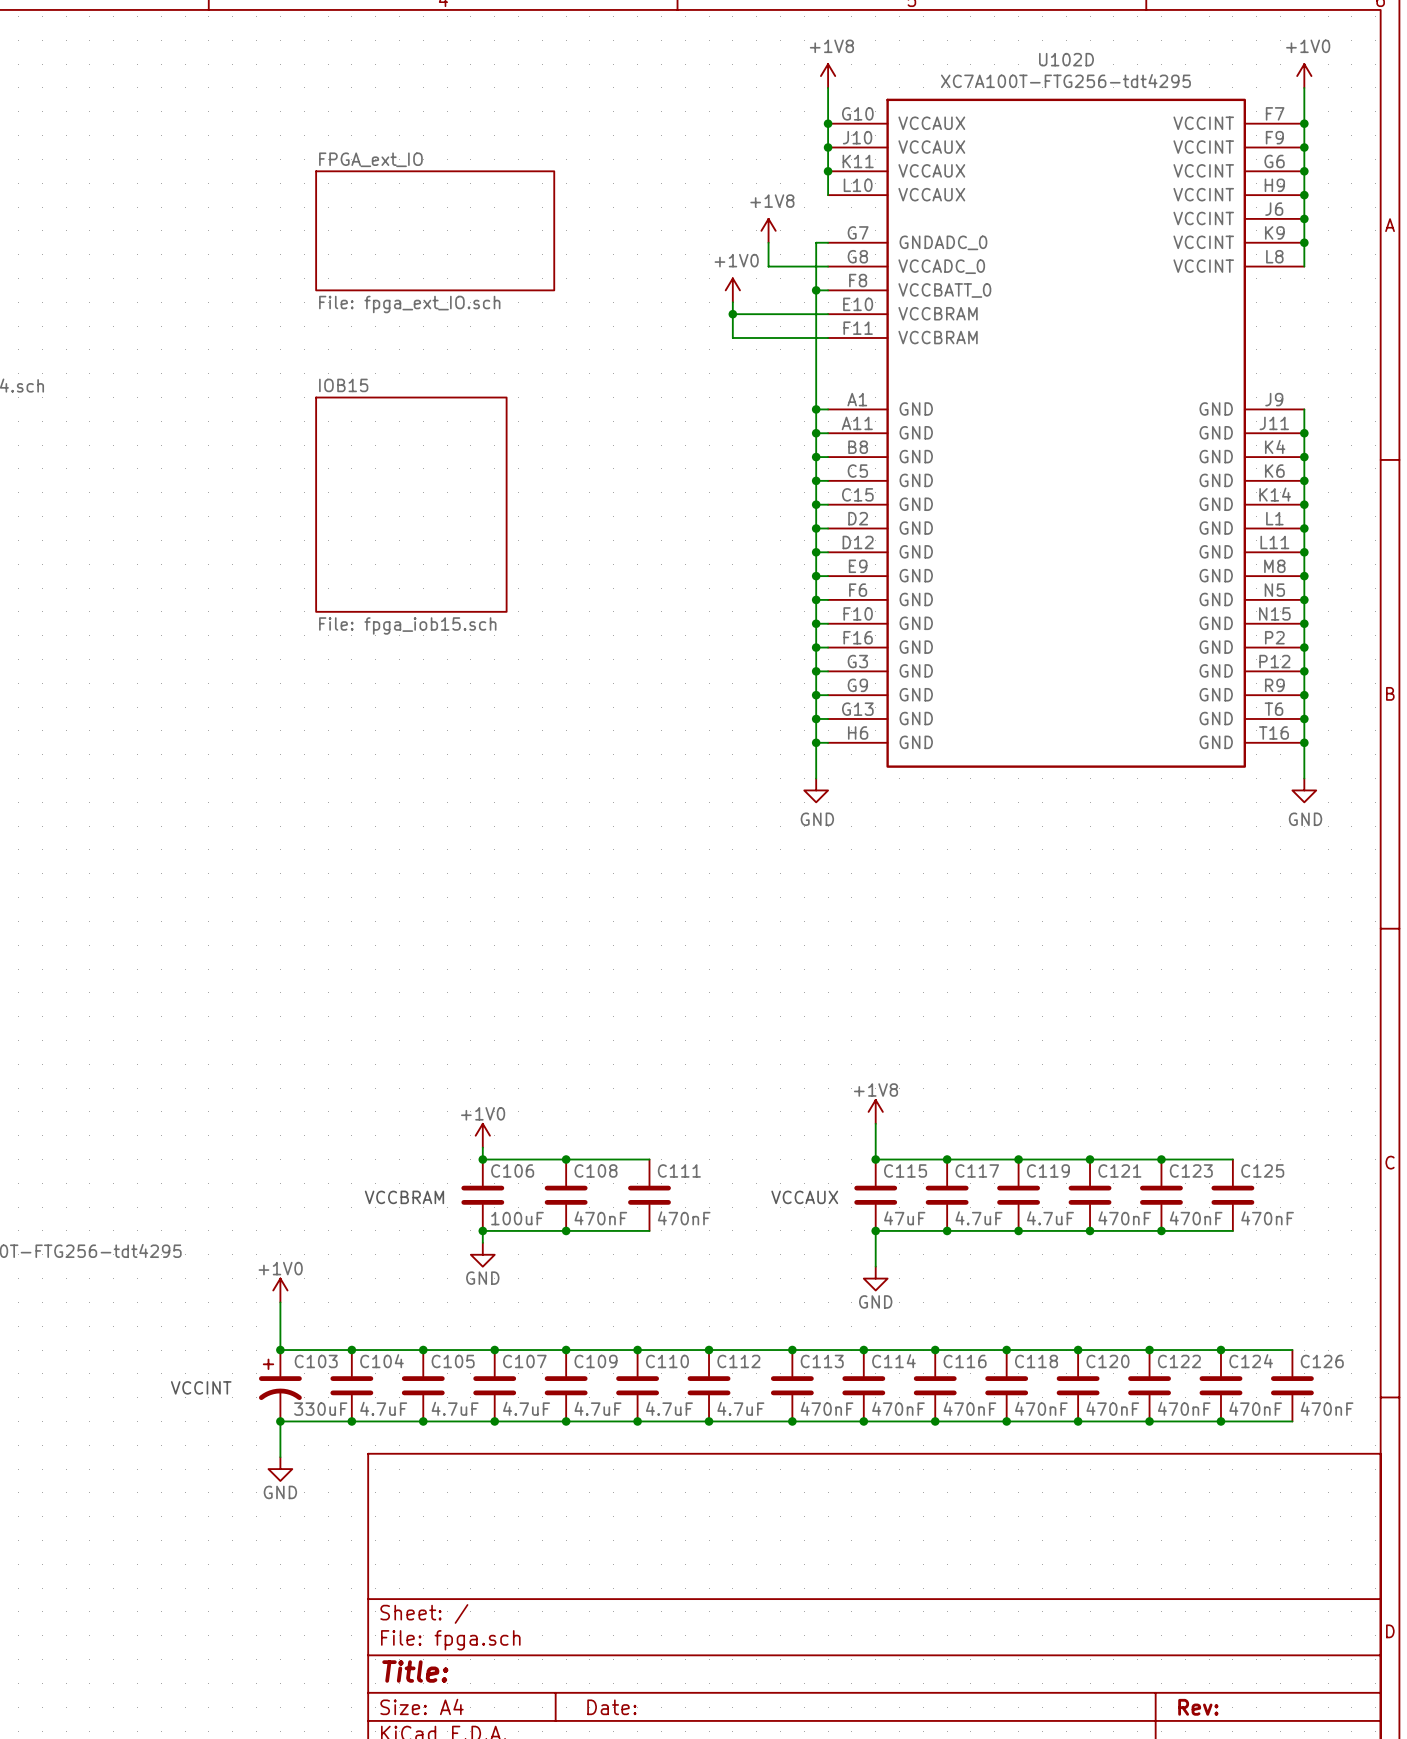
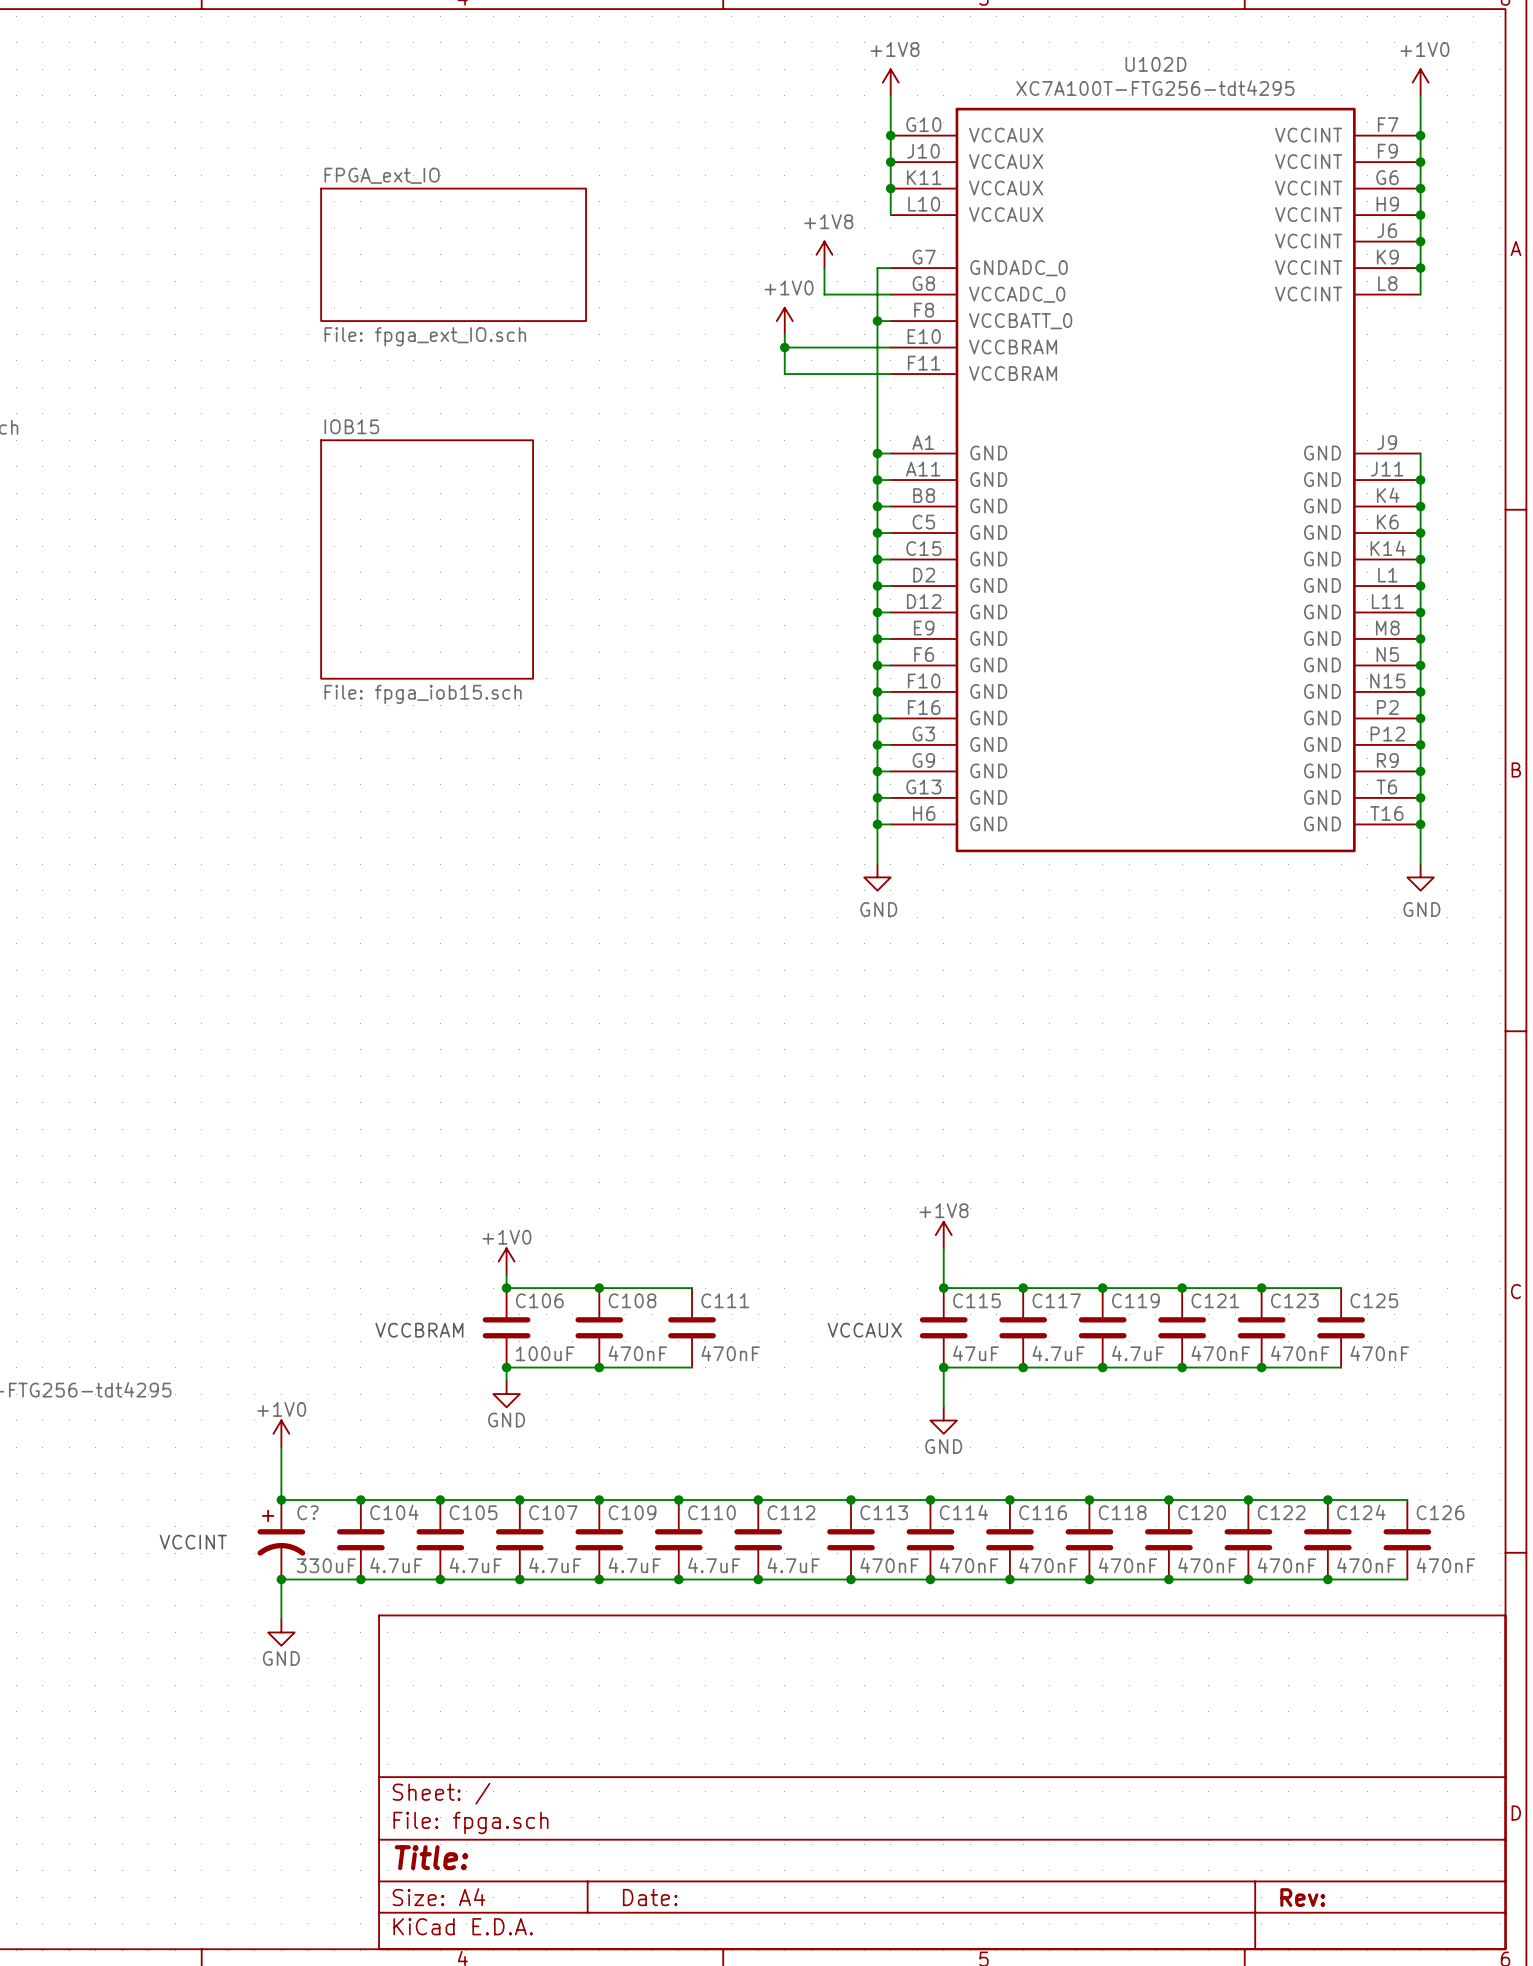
C103 name: C103 (316, 1361) -> C? (307, 1512)

